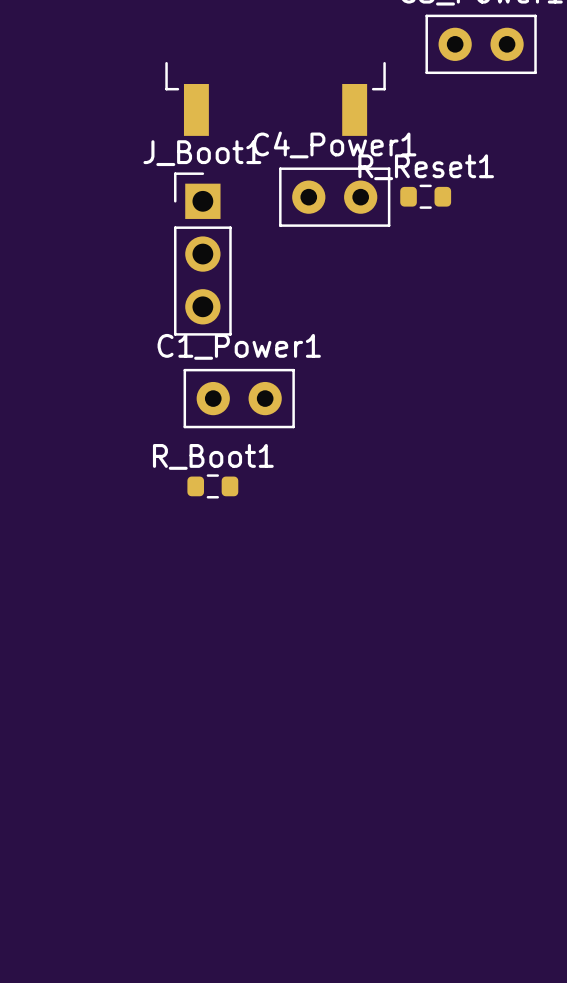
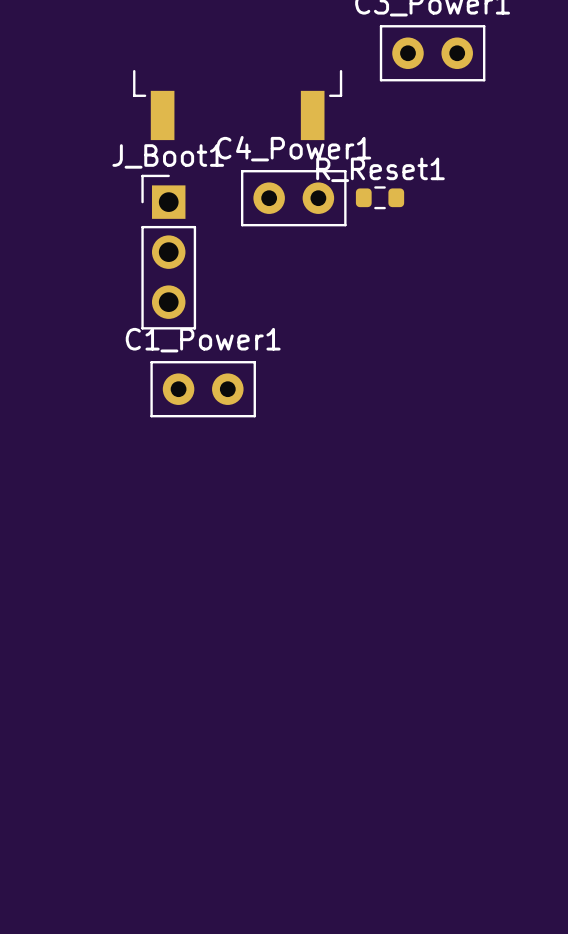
R_Boot1: (212, 486) -> none

